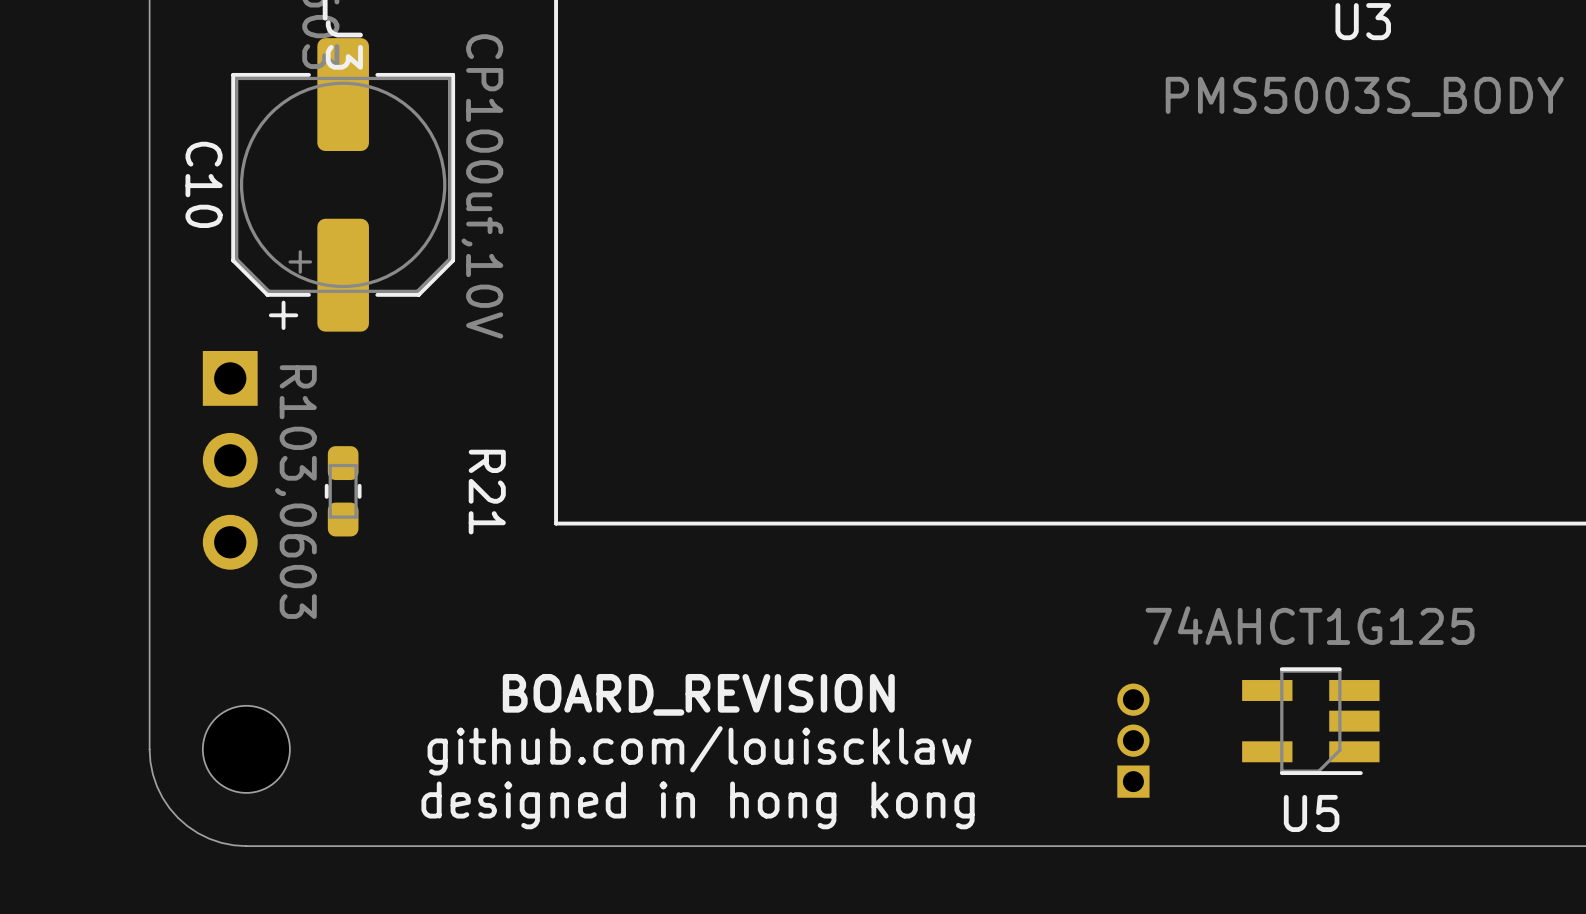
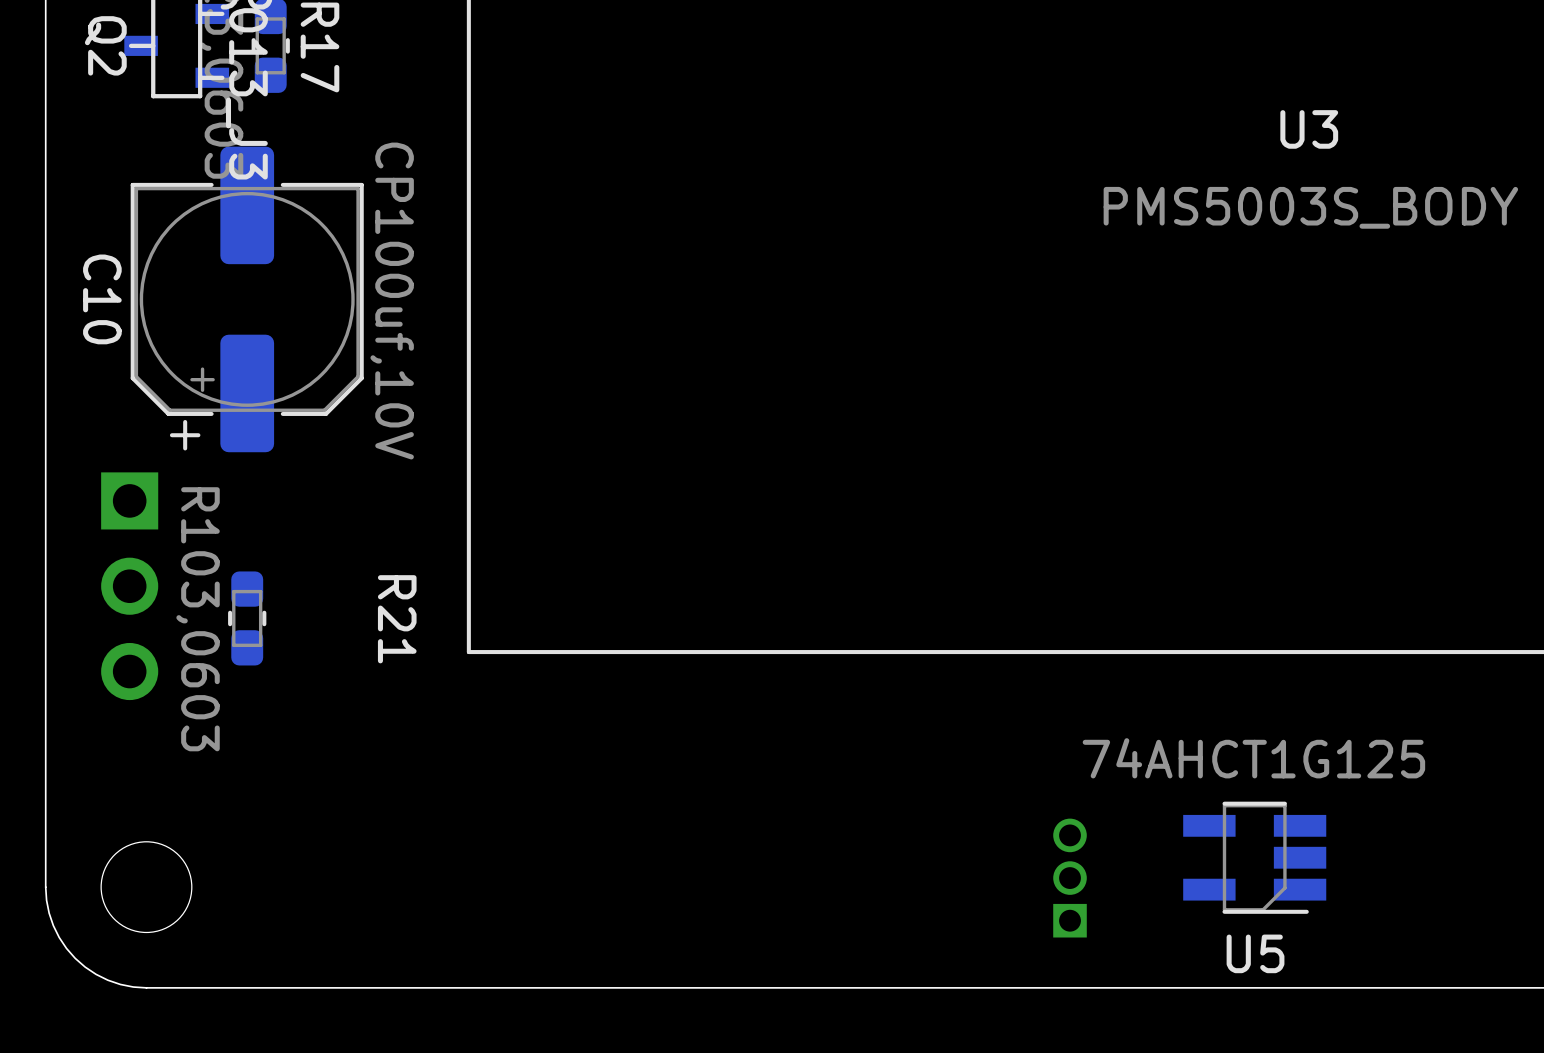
drawing: [421, 673, 975, 830] -> none

